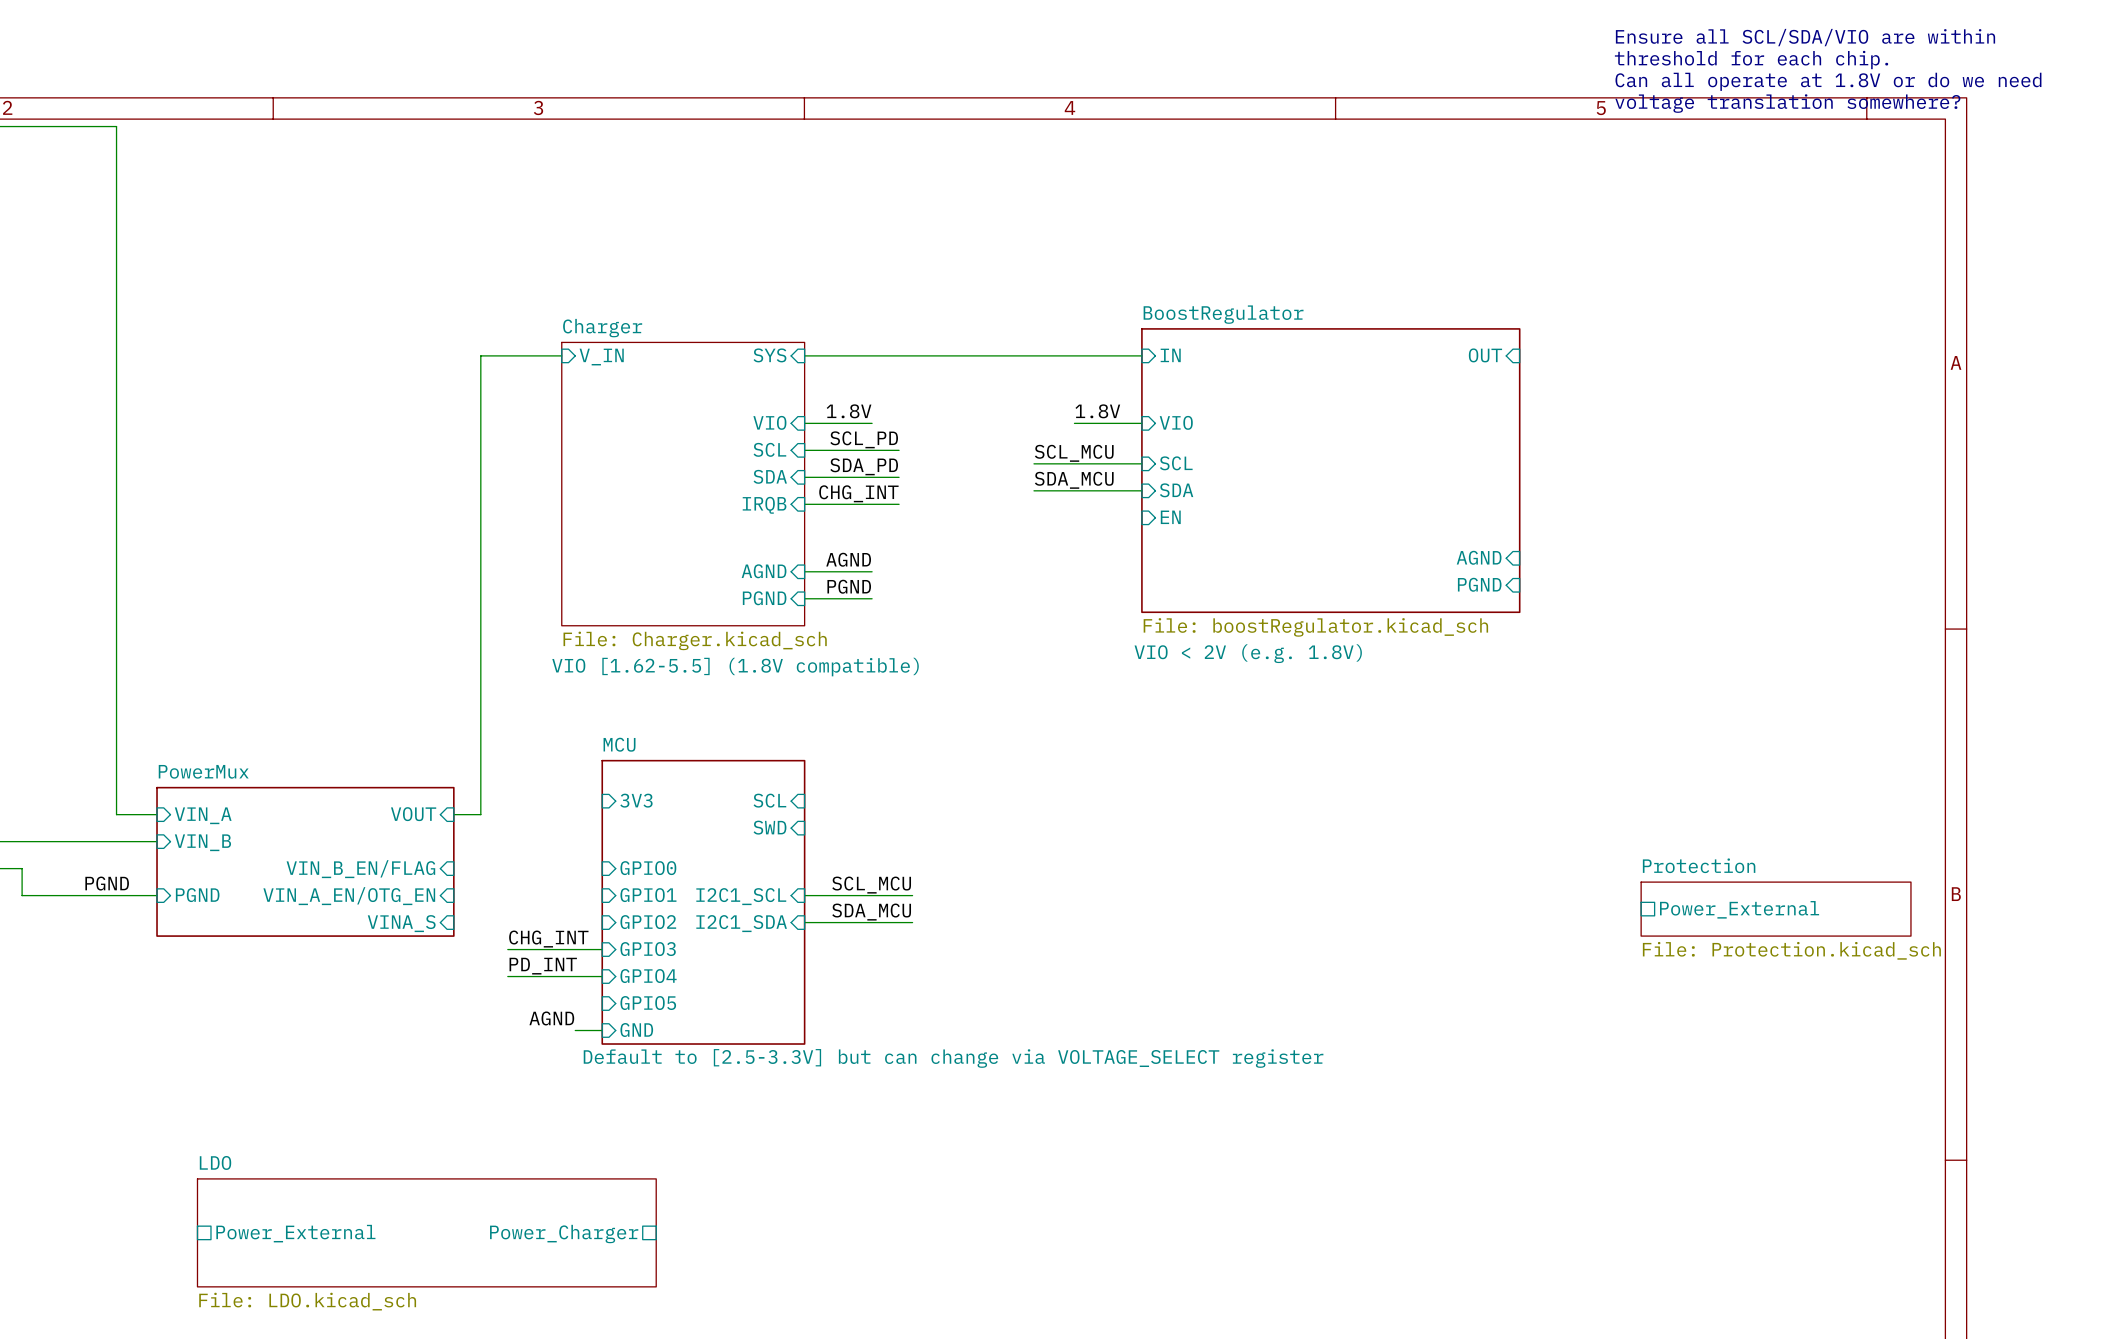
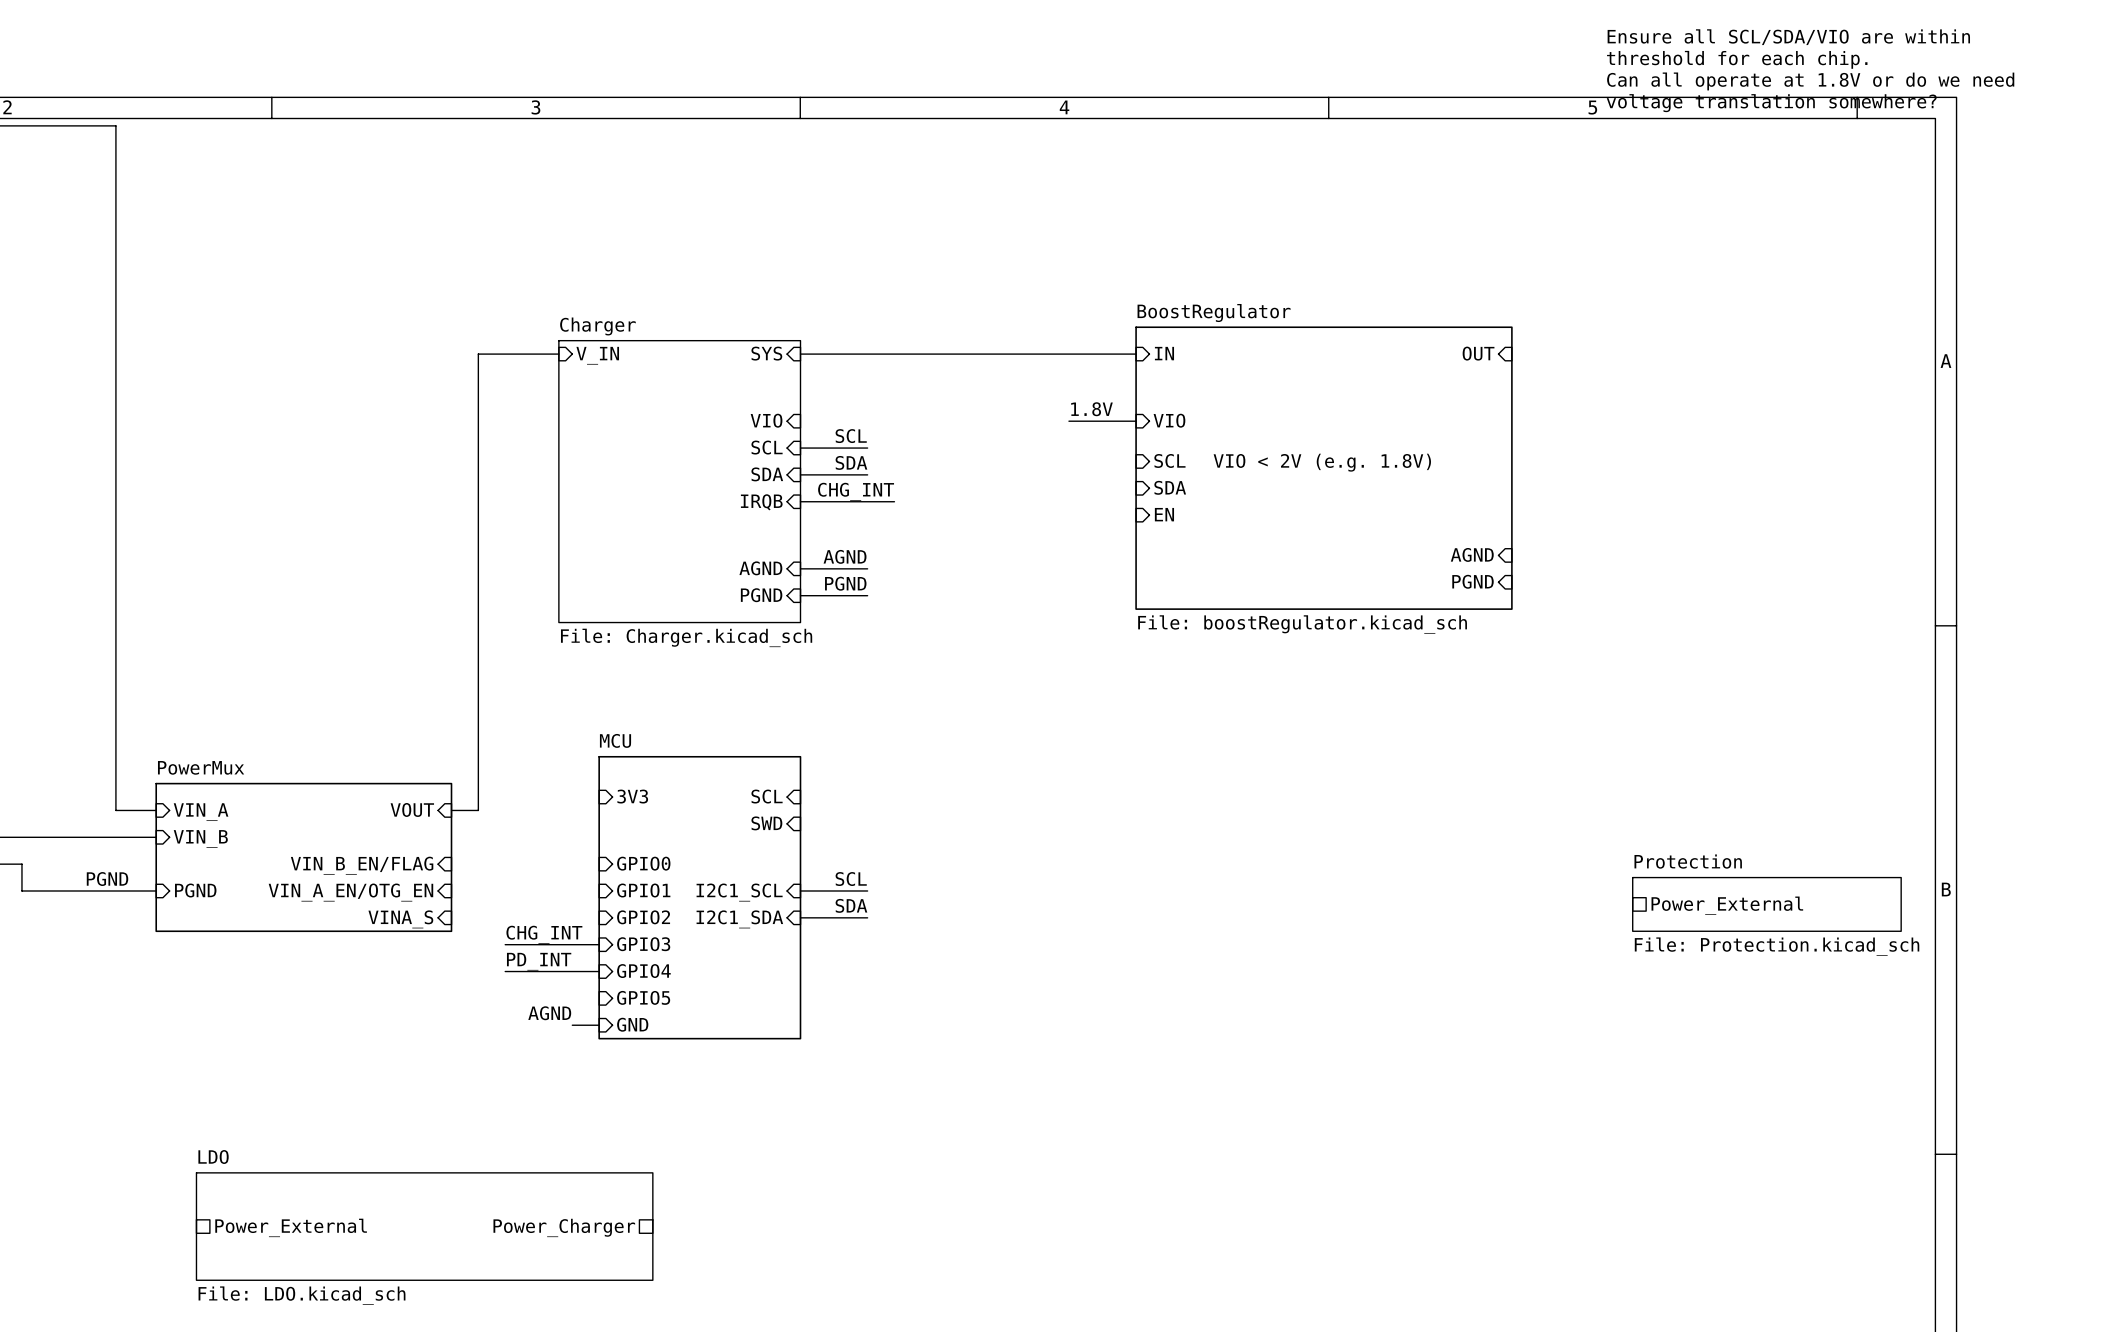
label: 1.8V (849, 411) -> none
wire: (804, 423) (872, 423) -> none
label: SCL_PD (864, 439) -> SCL (851, 436)
wire: (872, 450) (899, 450) -> none
label: SCL_MCU (1074, 453) -> none
wire: (1033, 463) (1141, 463) -> none
label: SDA_PD (864, 466) -> SDA (851, 462)
wire: (872, 477) (899, 477) -> none
label: SDA_MCU (1074, 480) -> none
wire: (1033, 490) (1141, 490) -> none
sheet BoostRegulator text position: VIO < 2V (e.g. 1.8V) (1248, 653) -> VIO < 2V (e.g. 1.8V) (1322, 462)
sheet Charger text: VIO [1.62-5.5] (1.8V compatible) (735, 667) -> none
label: none -> SCL (851, 879)
label: SCL_MCU (871, 885) -> none
wire: (872, 895) (912, 895) -> none
label: none -> SDA (851, 905)
label: SDA_MCU (871, 912) -> none
wire: (872, 922) (912, 922) -> none
sheet MCU text: Default to [2.5-3.3V] but can change via VOLTAGE_SELECT register (953, 1058) -> none

